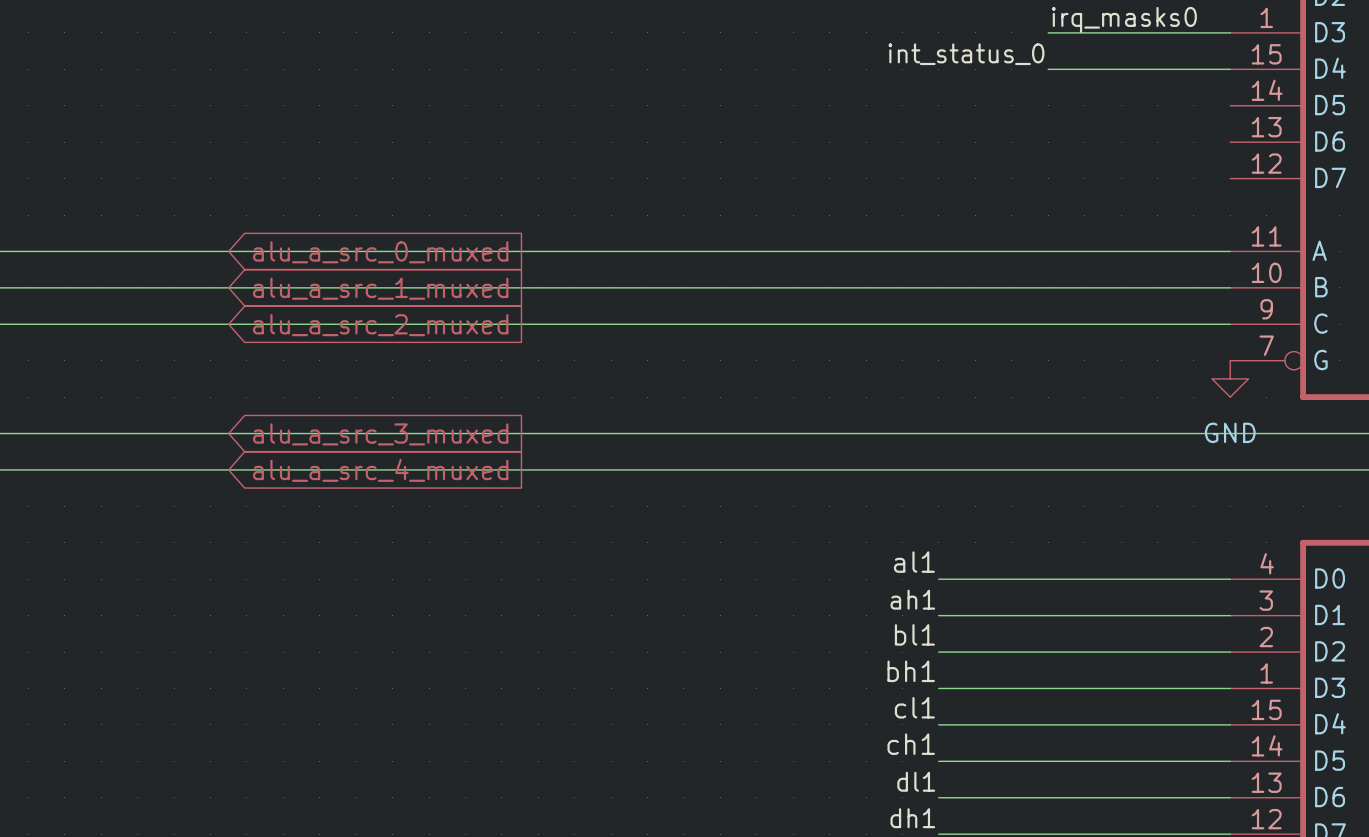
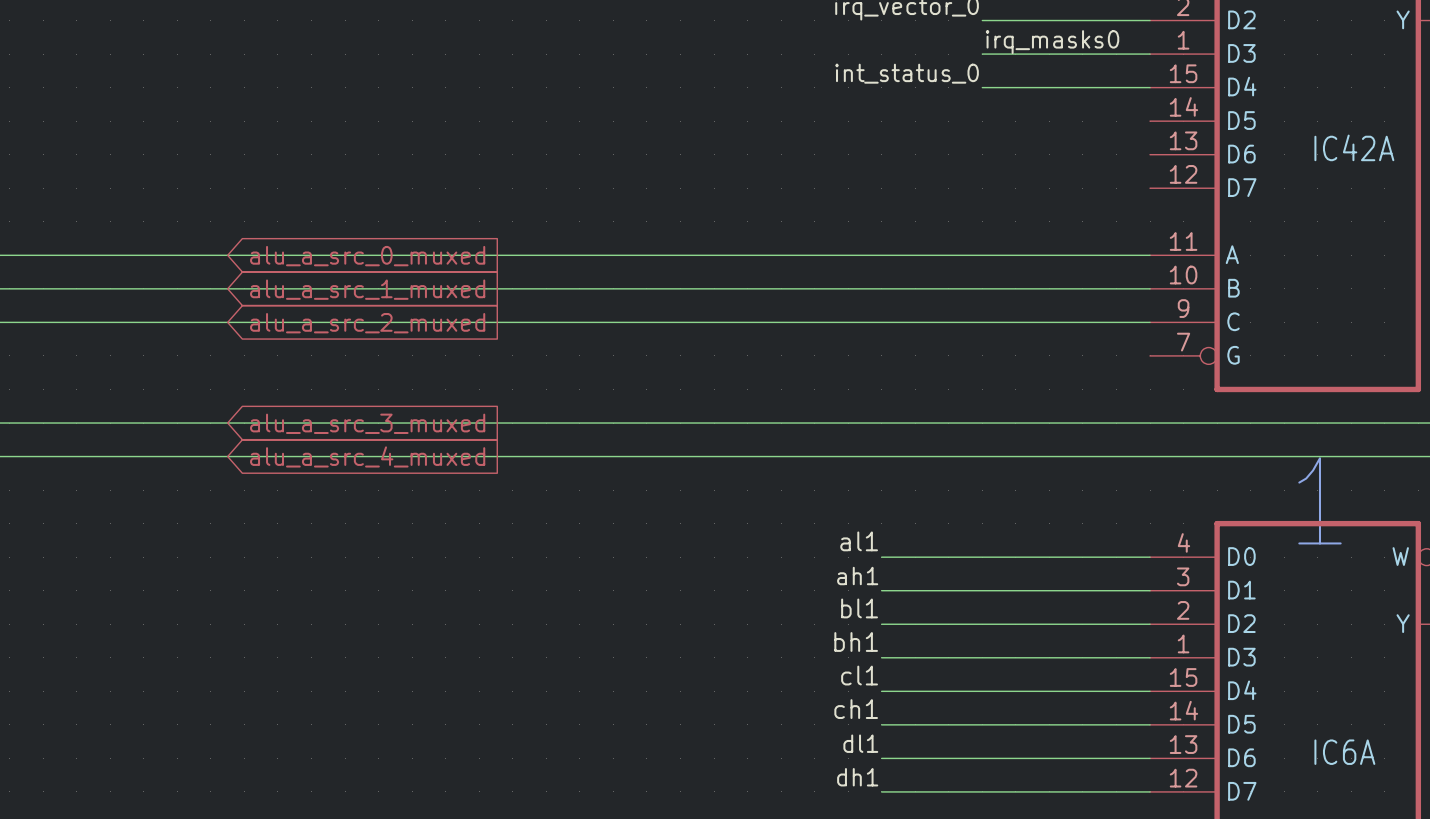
power symbol: GND (1230, 378) -> none

